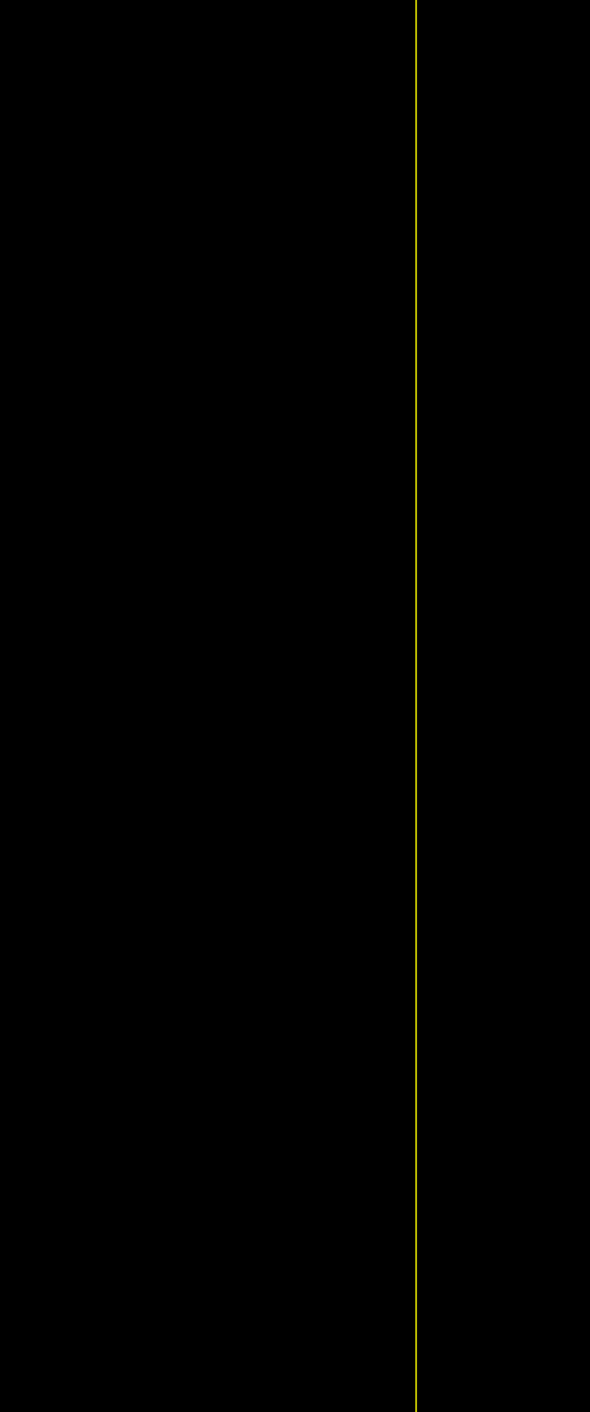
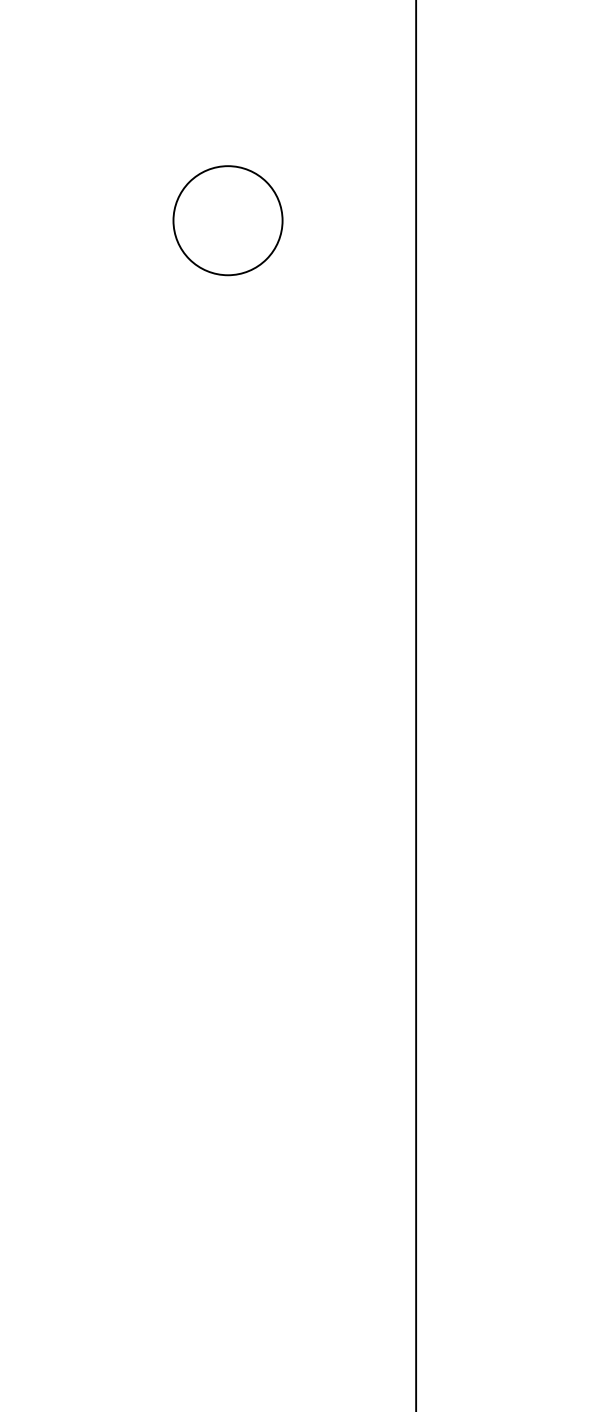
round board edge: none -> [172, 165, 284, 277]

